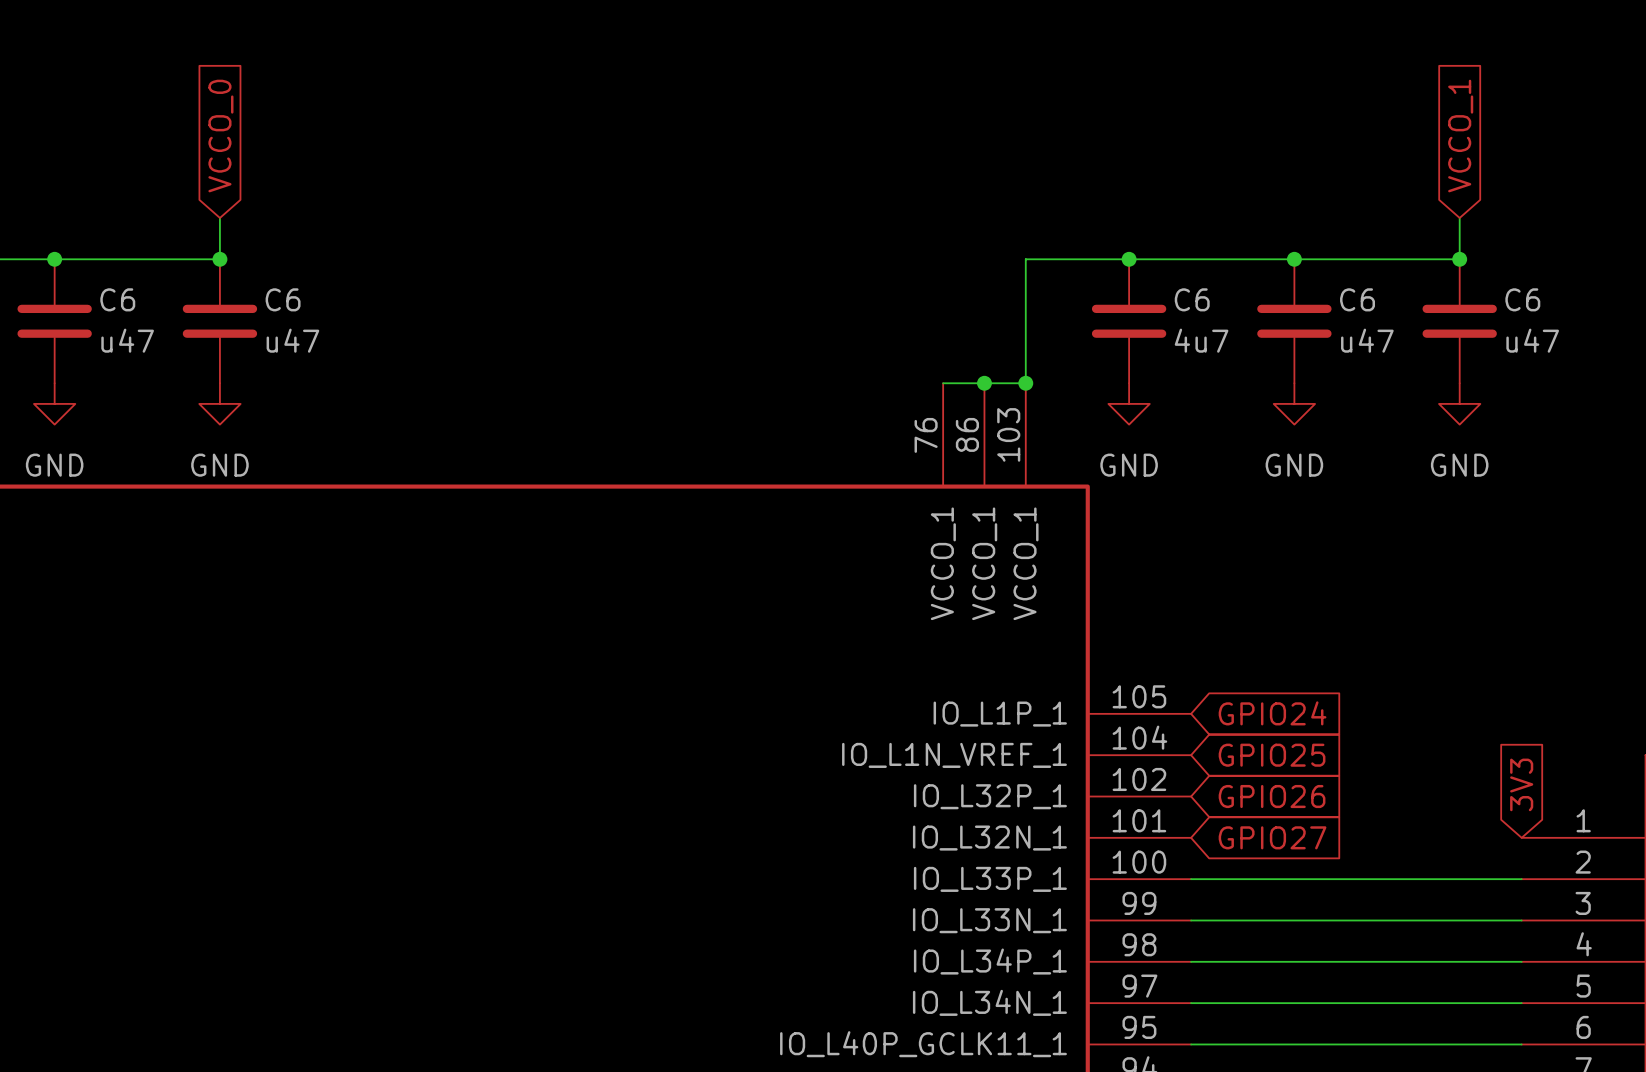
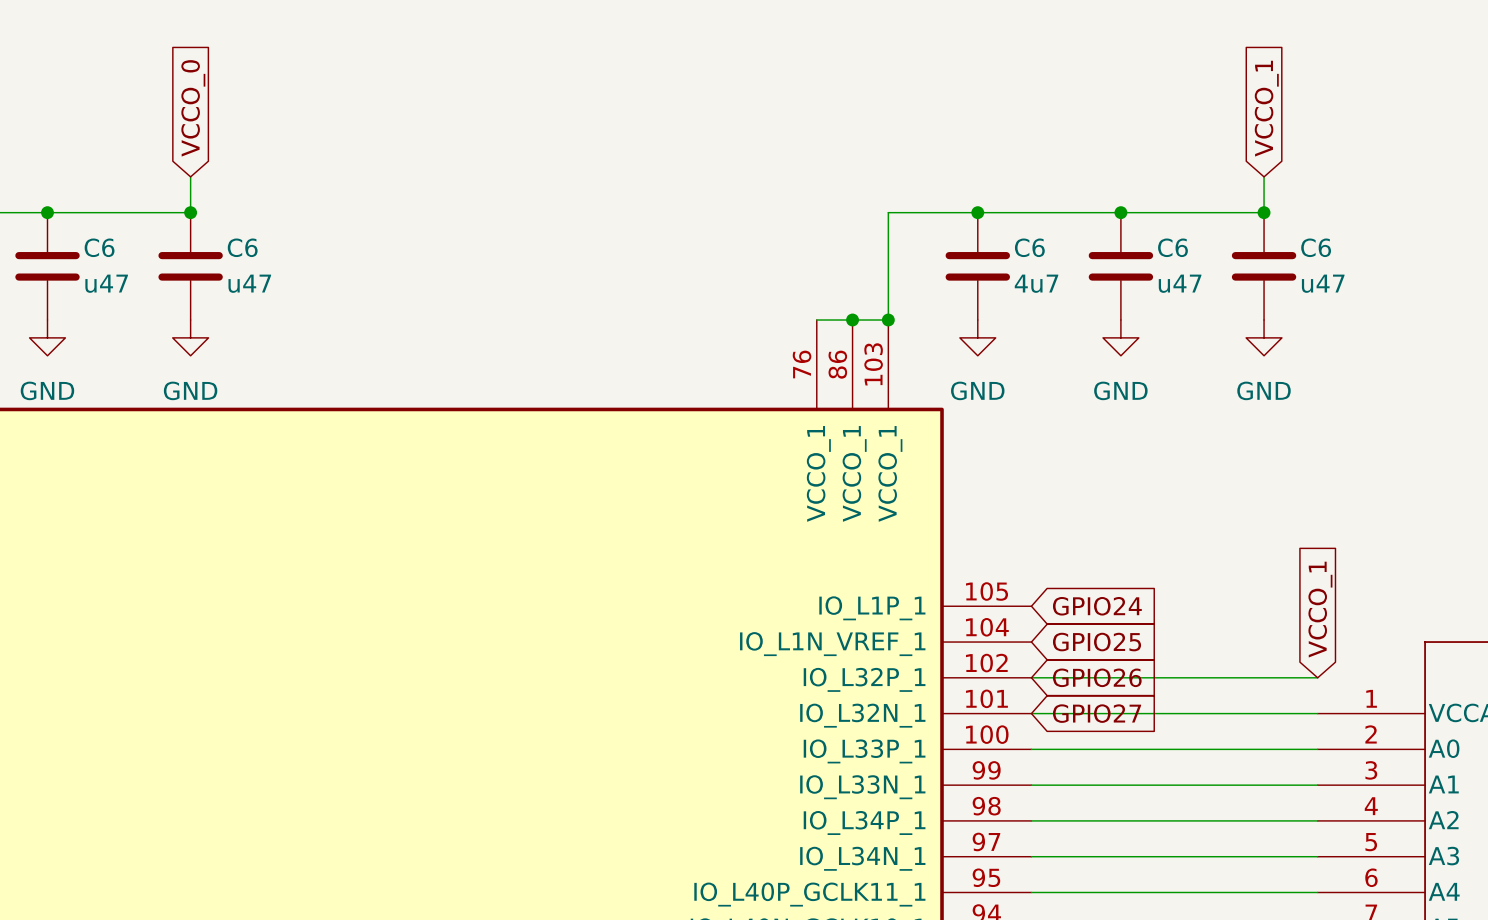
global label: none -> VCCO_1 (1320, 609)
global label: 3V3 (1521, 784) -> none
wire: none -> (1031, 677) (1317, 677)
wire: none -> (1031, 713) (1317, 713)

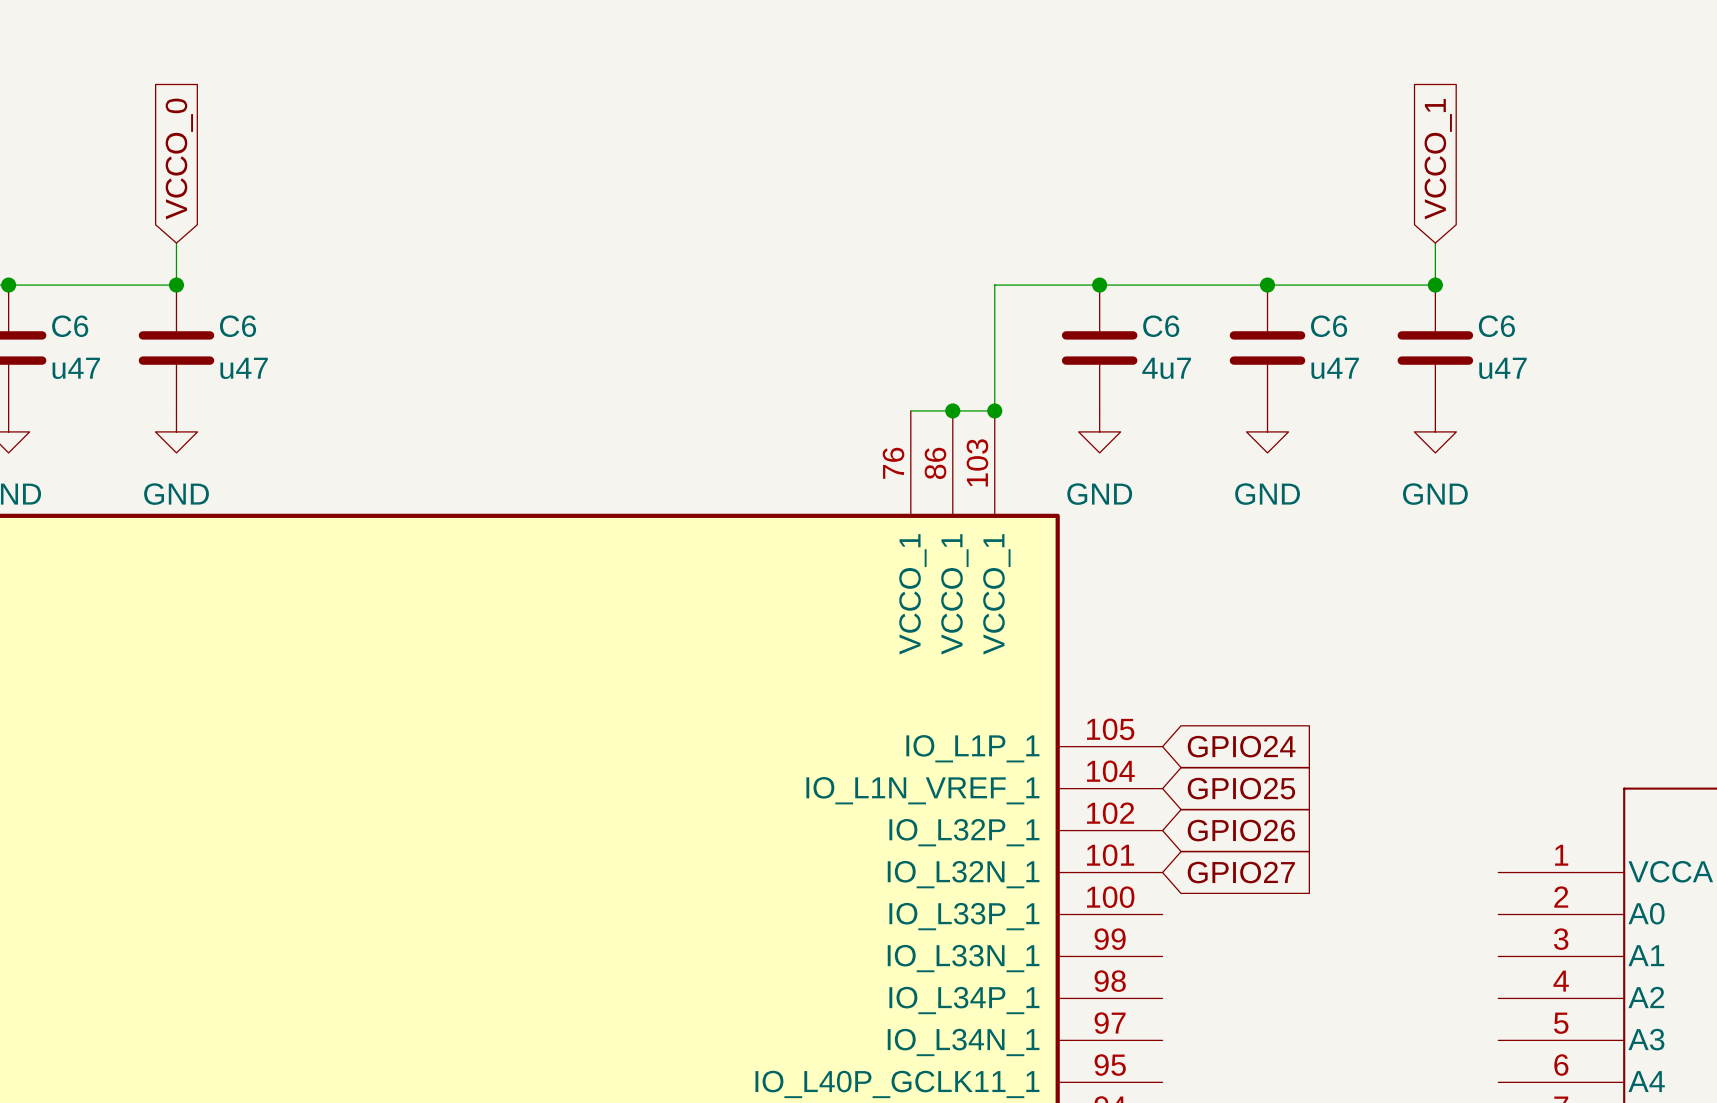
global label: VCCO_1 (1320, 609) -> none
wire: (1031, 677) (1317, 677) -> none
wire: (1031, 713) (1317, 713) -> none
wire: (1031, 749) (1317, 749) -> none
wire: (1031, 785) (1317, 785) -> none
wire: (1031, 820) (1317, 820) -> none
wire: (1031, 856) (1317, 856) -> none
wire: (1031, 892) (1317, 892) -> none

